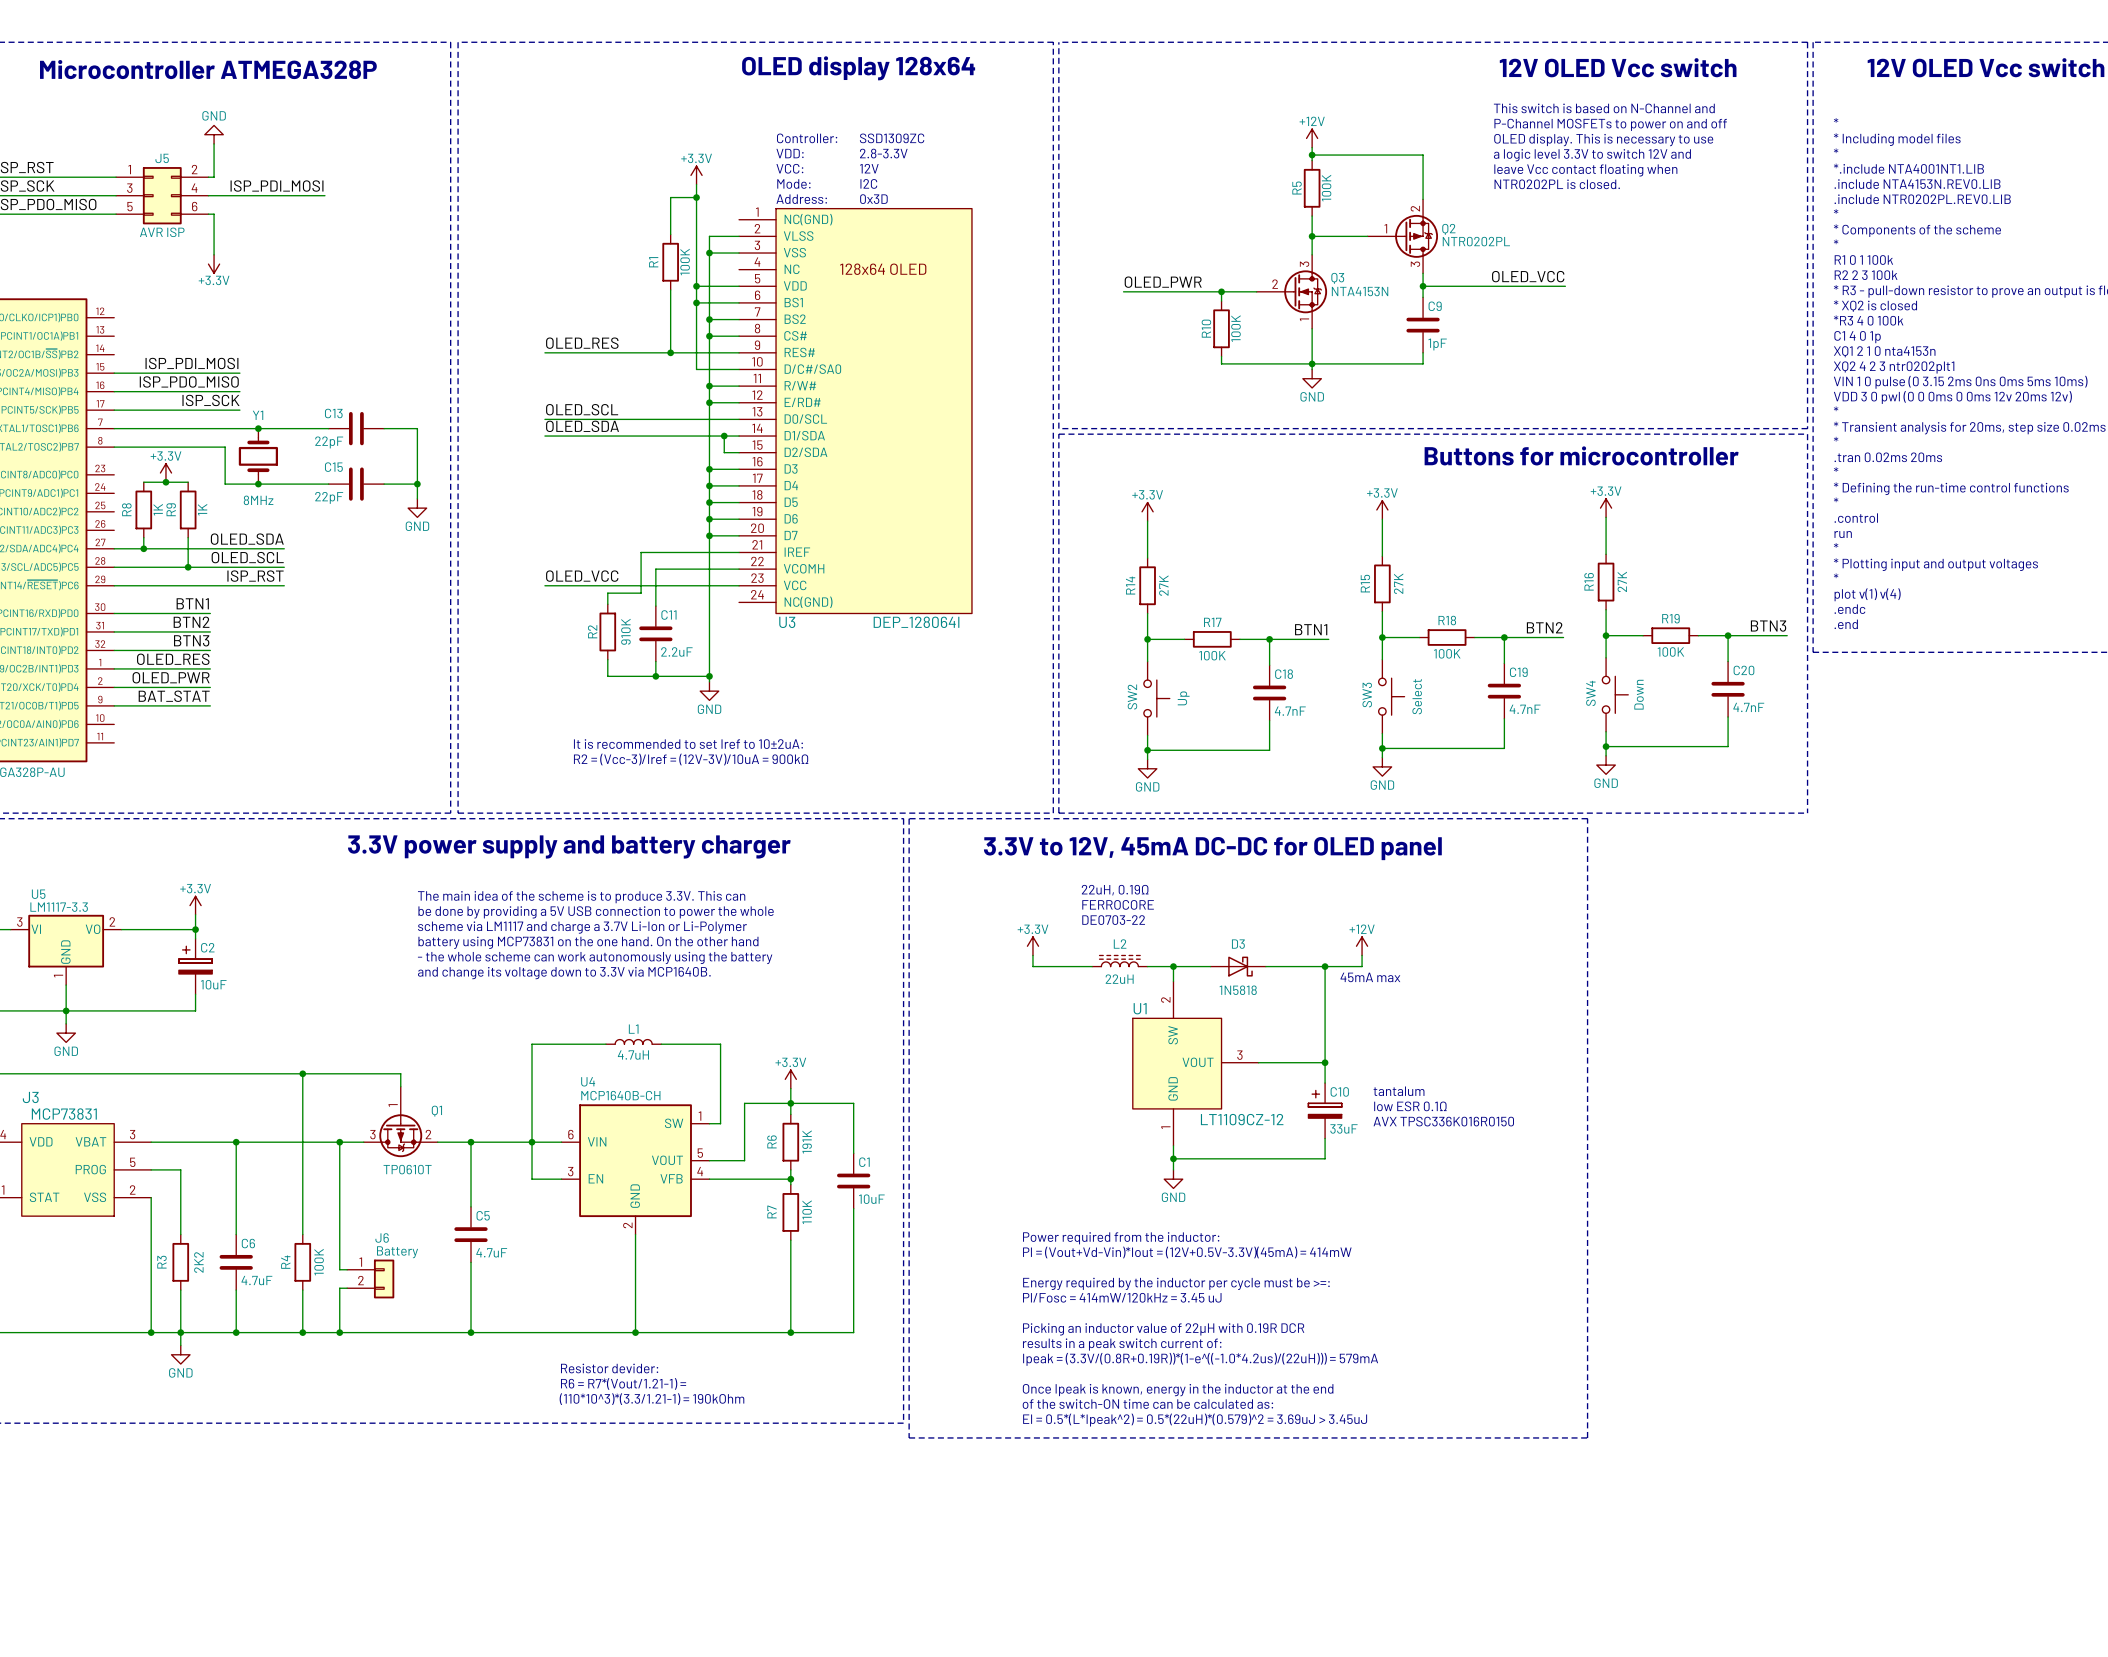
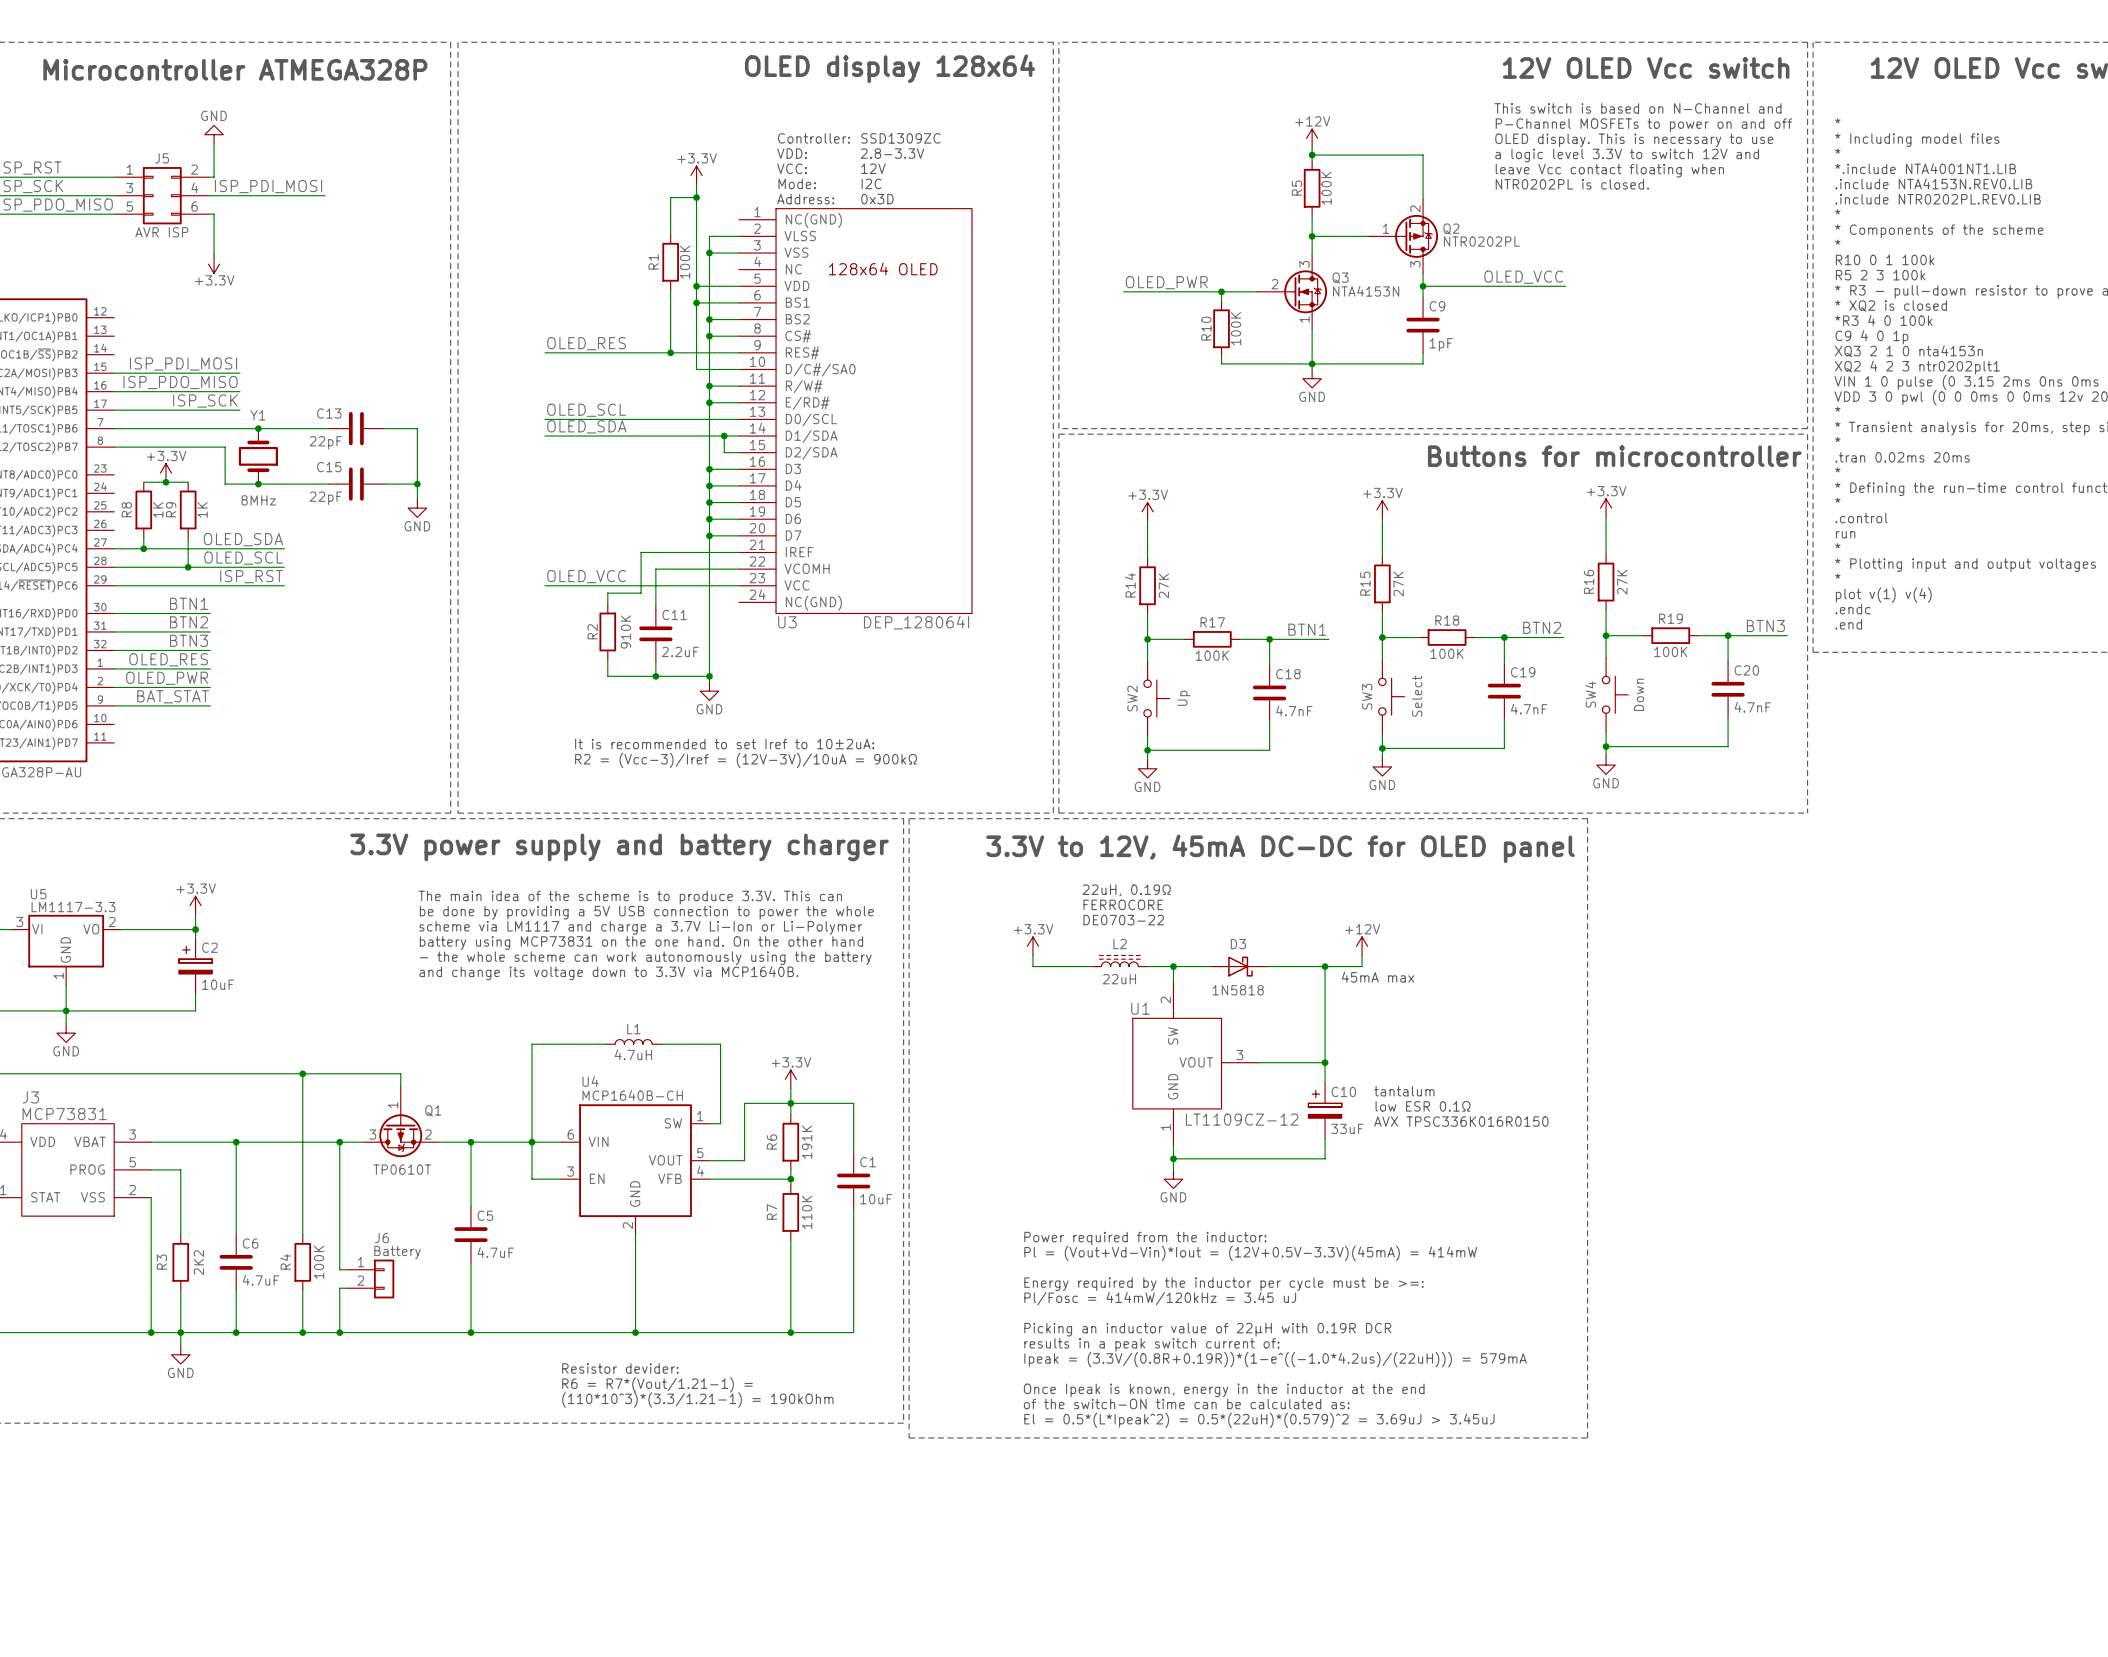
text: R1 0 1 100k (1863, 260) -> R10 0 1 100k (1885, 259)
text: R2 2 3 100k (1866, 275) -> R5 2 3 100k (1880, 275)
text: C1 4 0 1p (1857, 337) -> C9 4 0 1p (1871, 337)
text: XQ1 2 1 0 nta4153n (1884, 351) -> XQ3 2 1 0 nta4153n (1908, 351)

